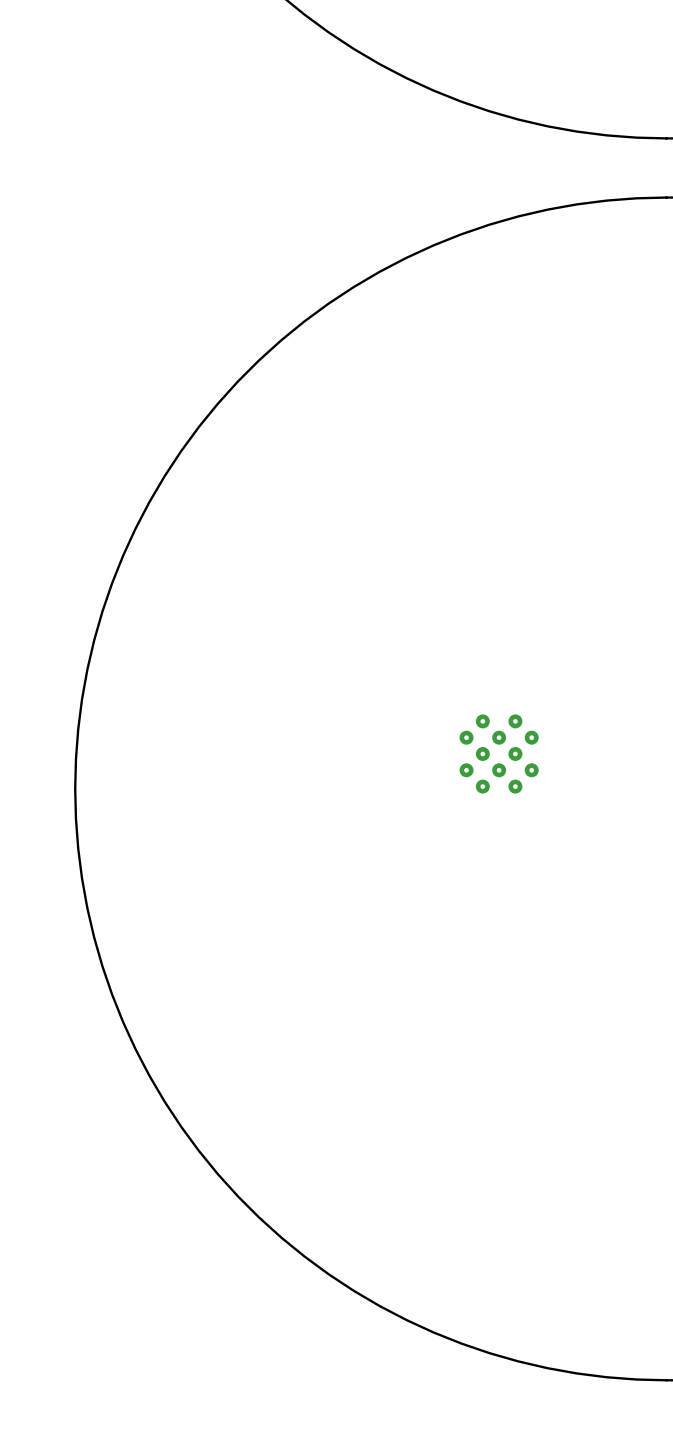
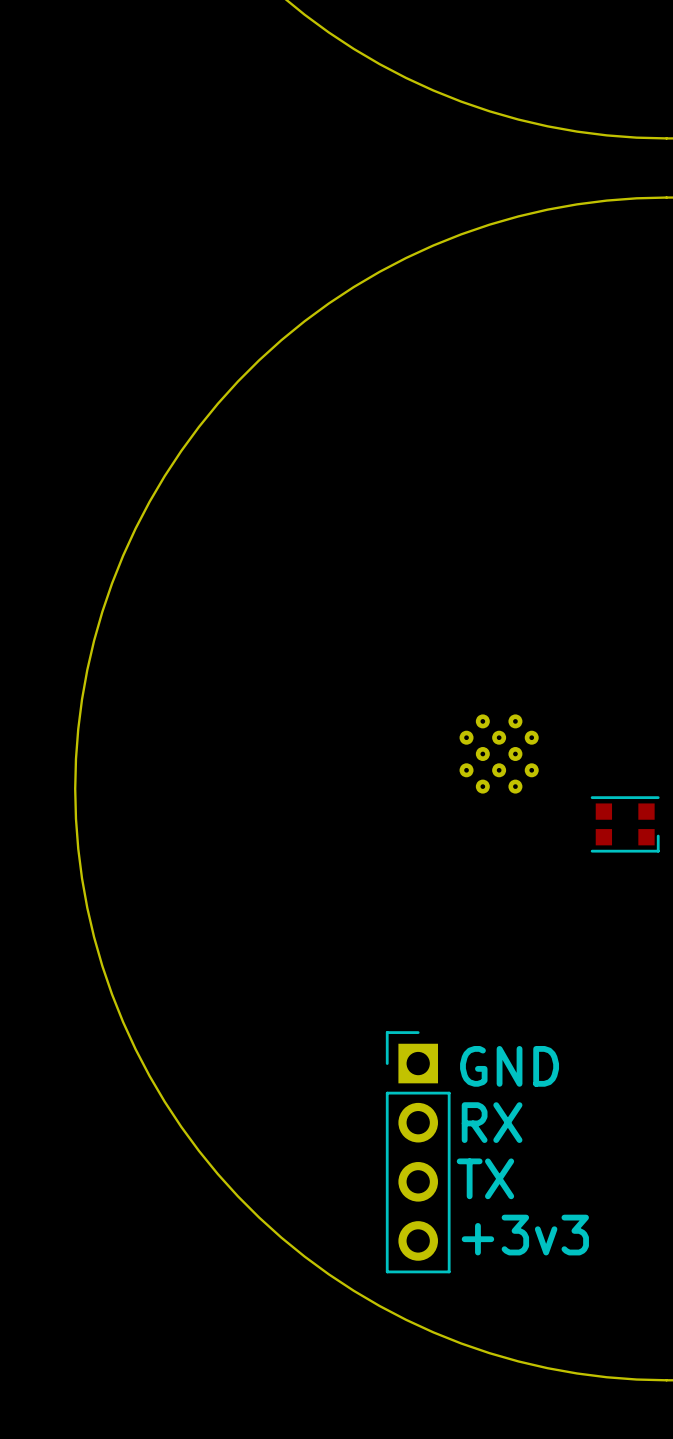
part: none -> (625, 824)
text: none -> GND (509, 1066)
text: none -> RX (492, 1122)
part: none -> (418, 1152)
text: none -> TX (485, 1178)
text: none -> +3v3 (525, 1235)

